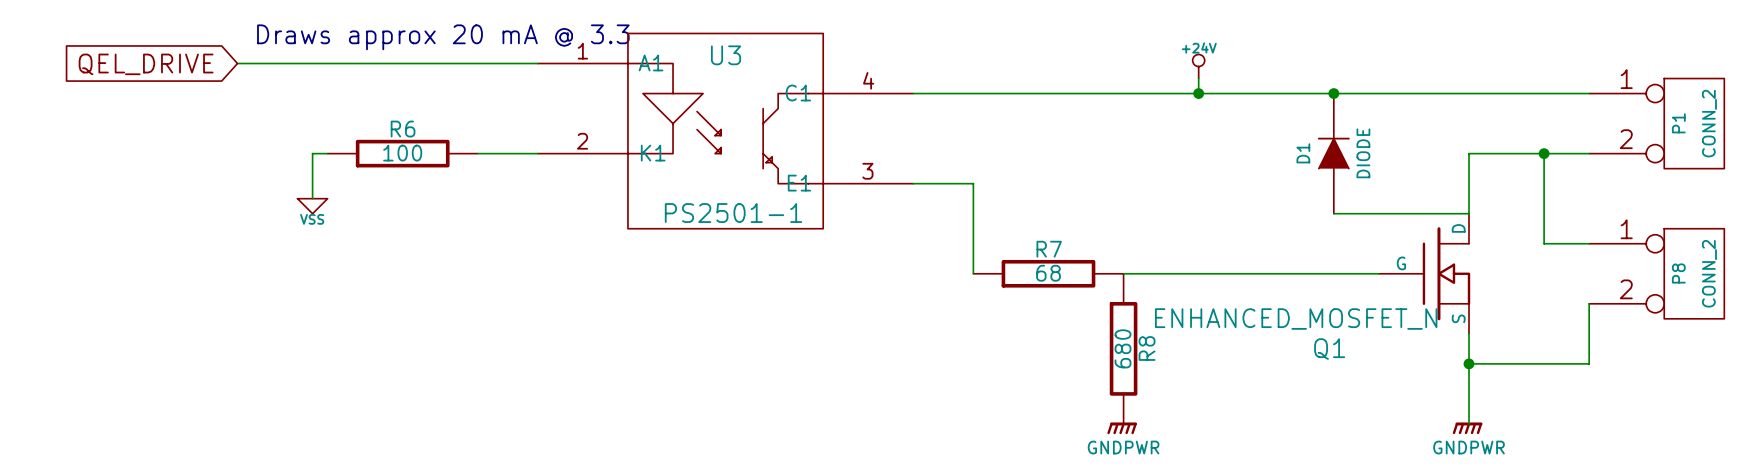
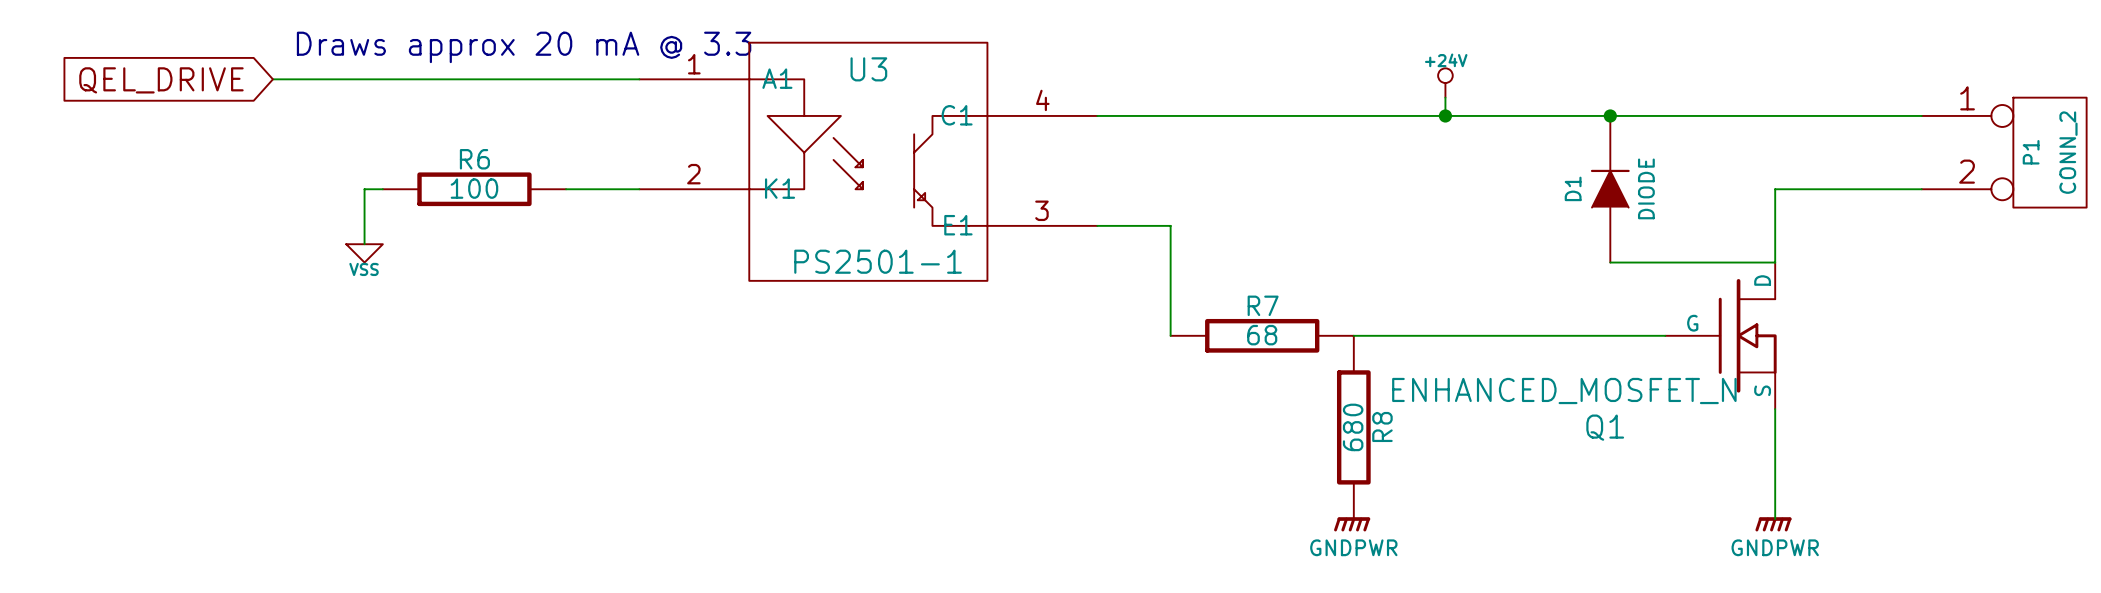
wire: (1544, 153) (1544, 243) (1589, 243) -> none
junction: (1544, 153) -> none
P8: CONN_2 (1656, 273) -> none
wire: (1589, 303) (1589, 363) (1469, 363) -> none
junction: (1469, 363) -> none

